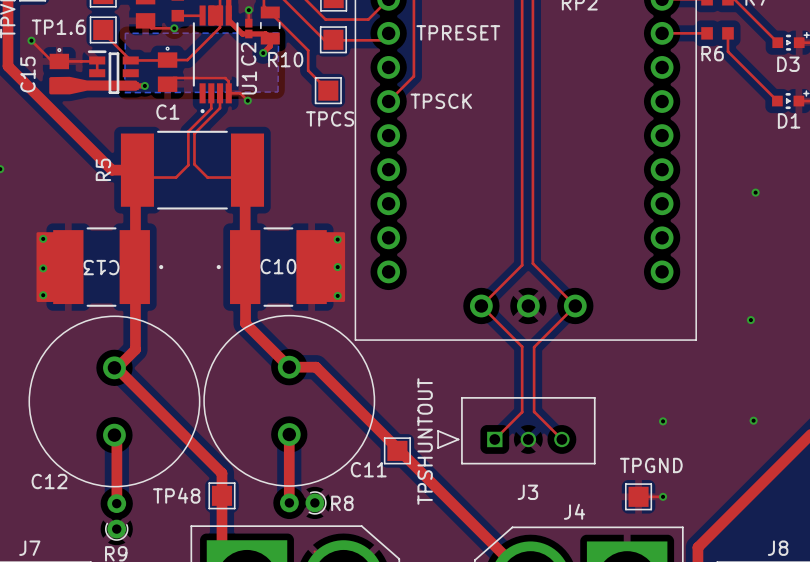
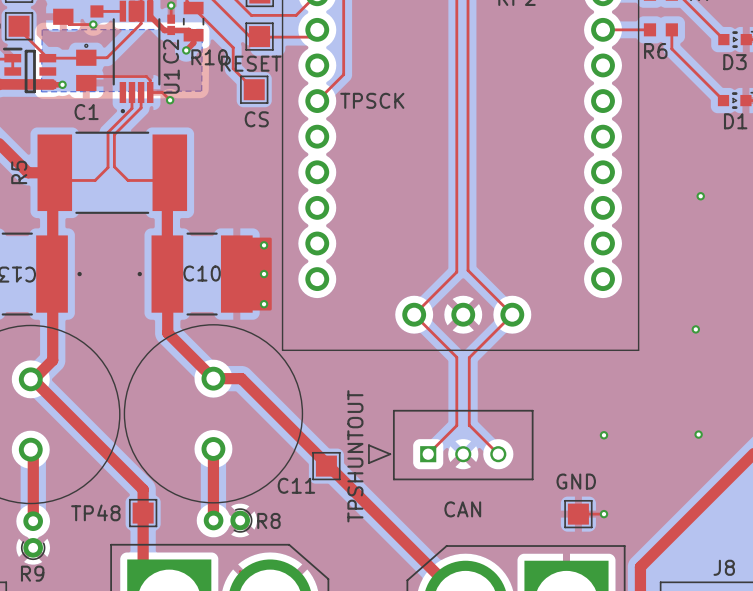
TPRESET name: TPRESET (458, 32) -> RESET (251, 63)
TPCS name: TPCS (330, 118) -> CS (256, 119)
TPGND name: TPGND (651, 465) -> GND (576, 481)
J3 name: J3 (527, 492) -> CAN (462, 509)
J4 name: J4 (574, 511) -> none

